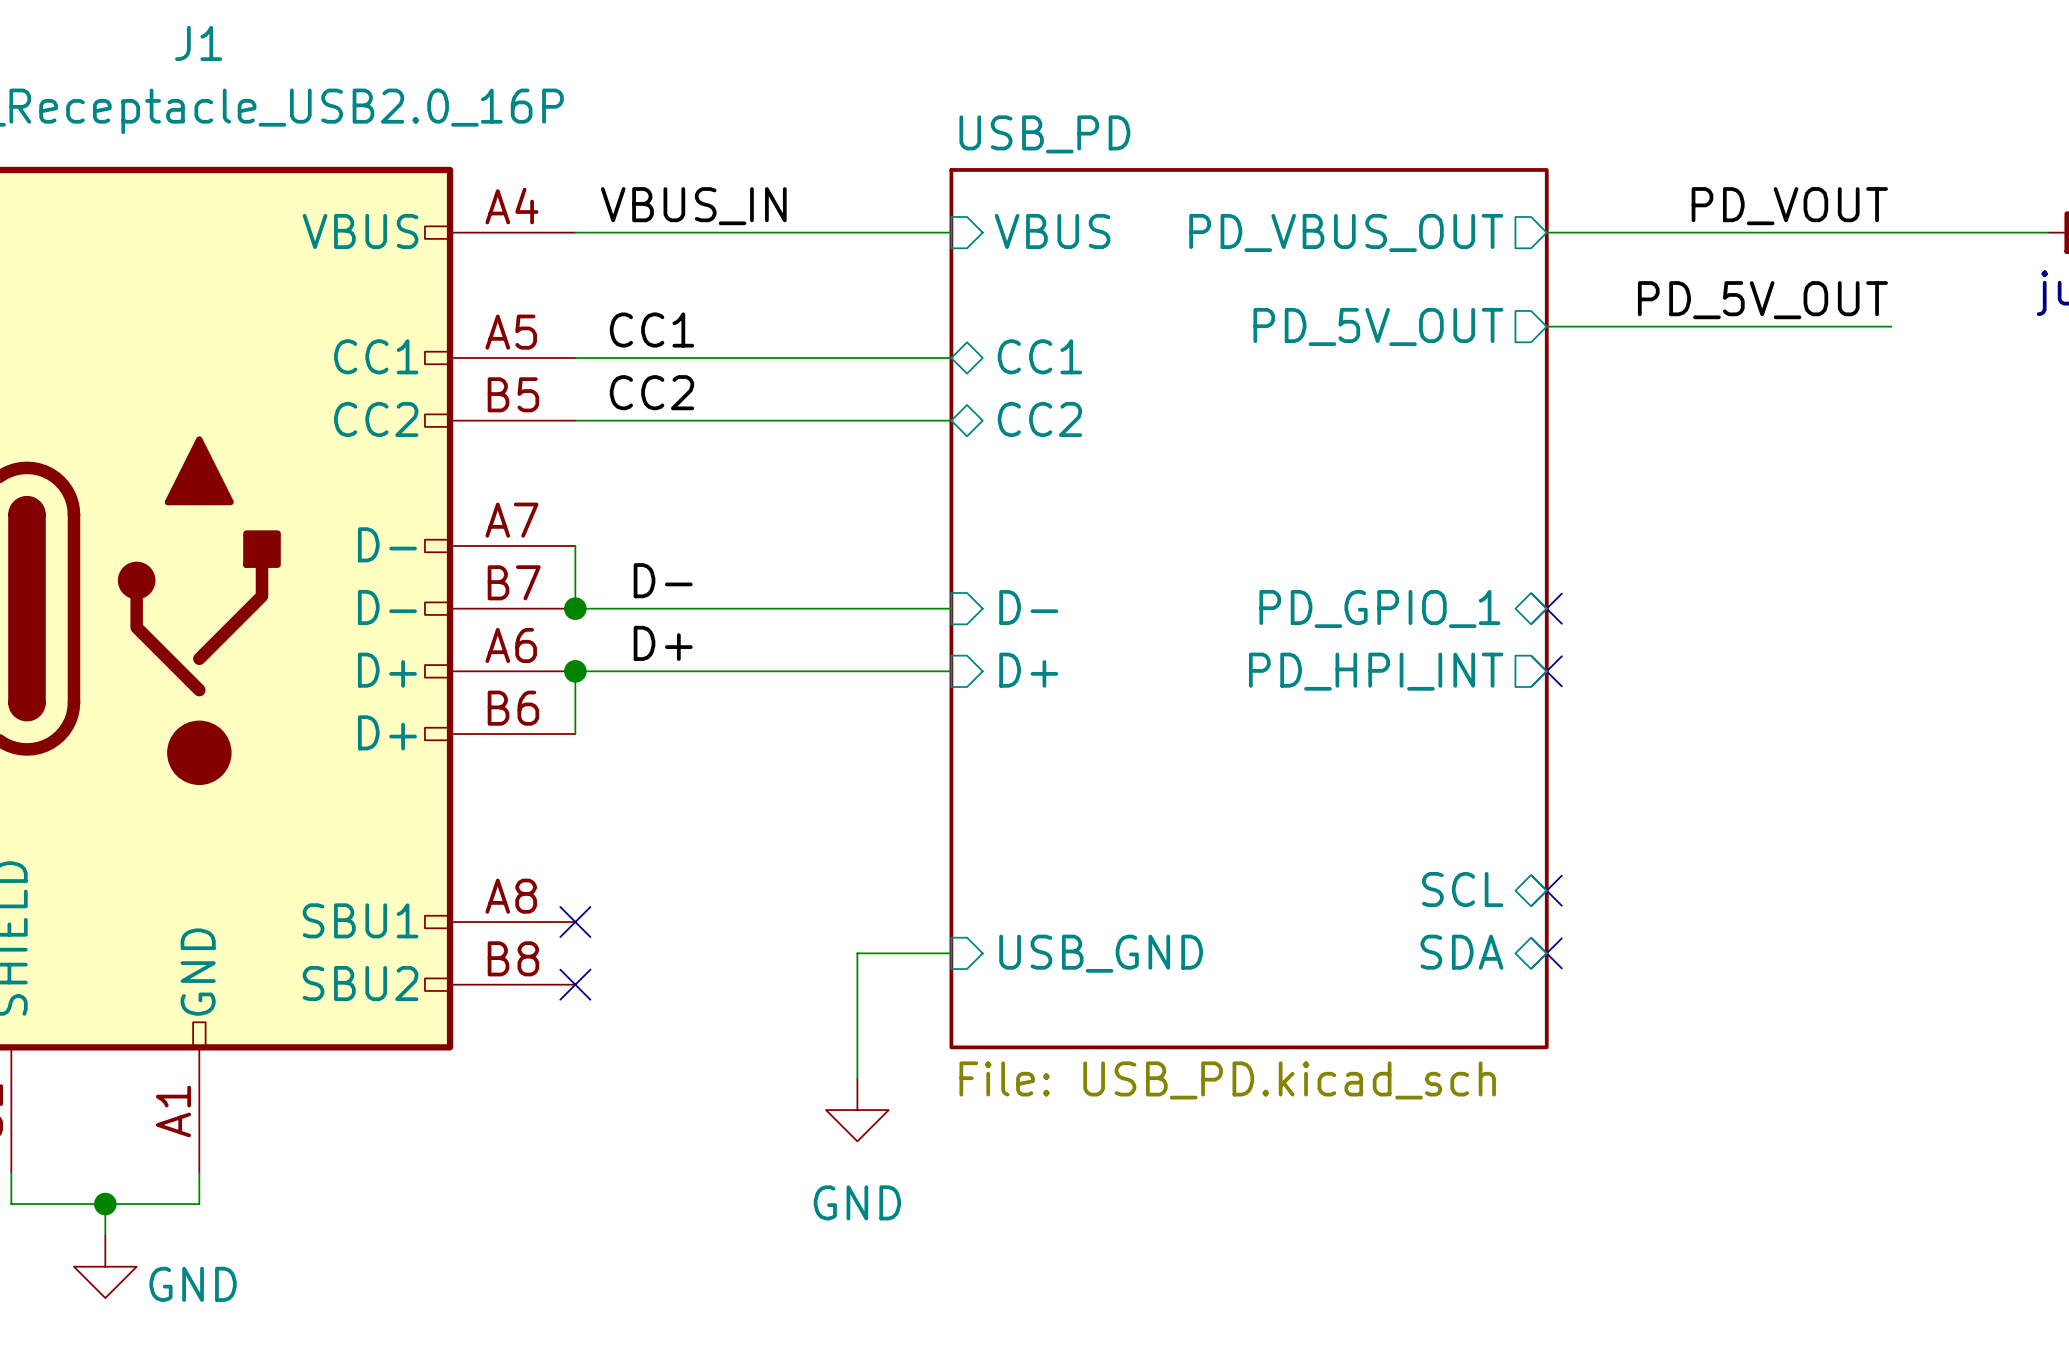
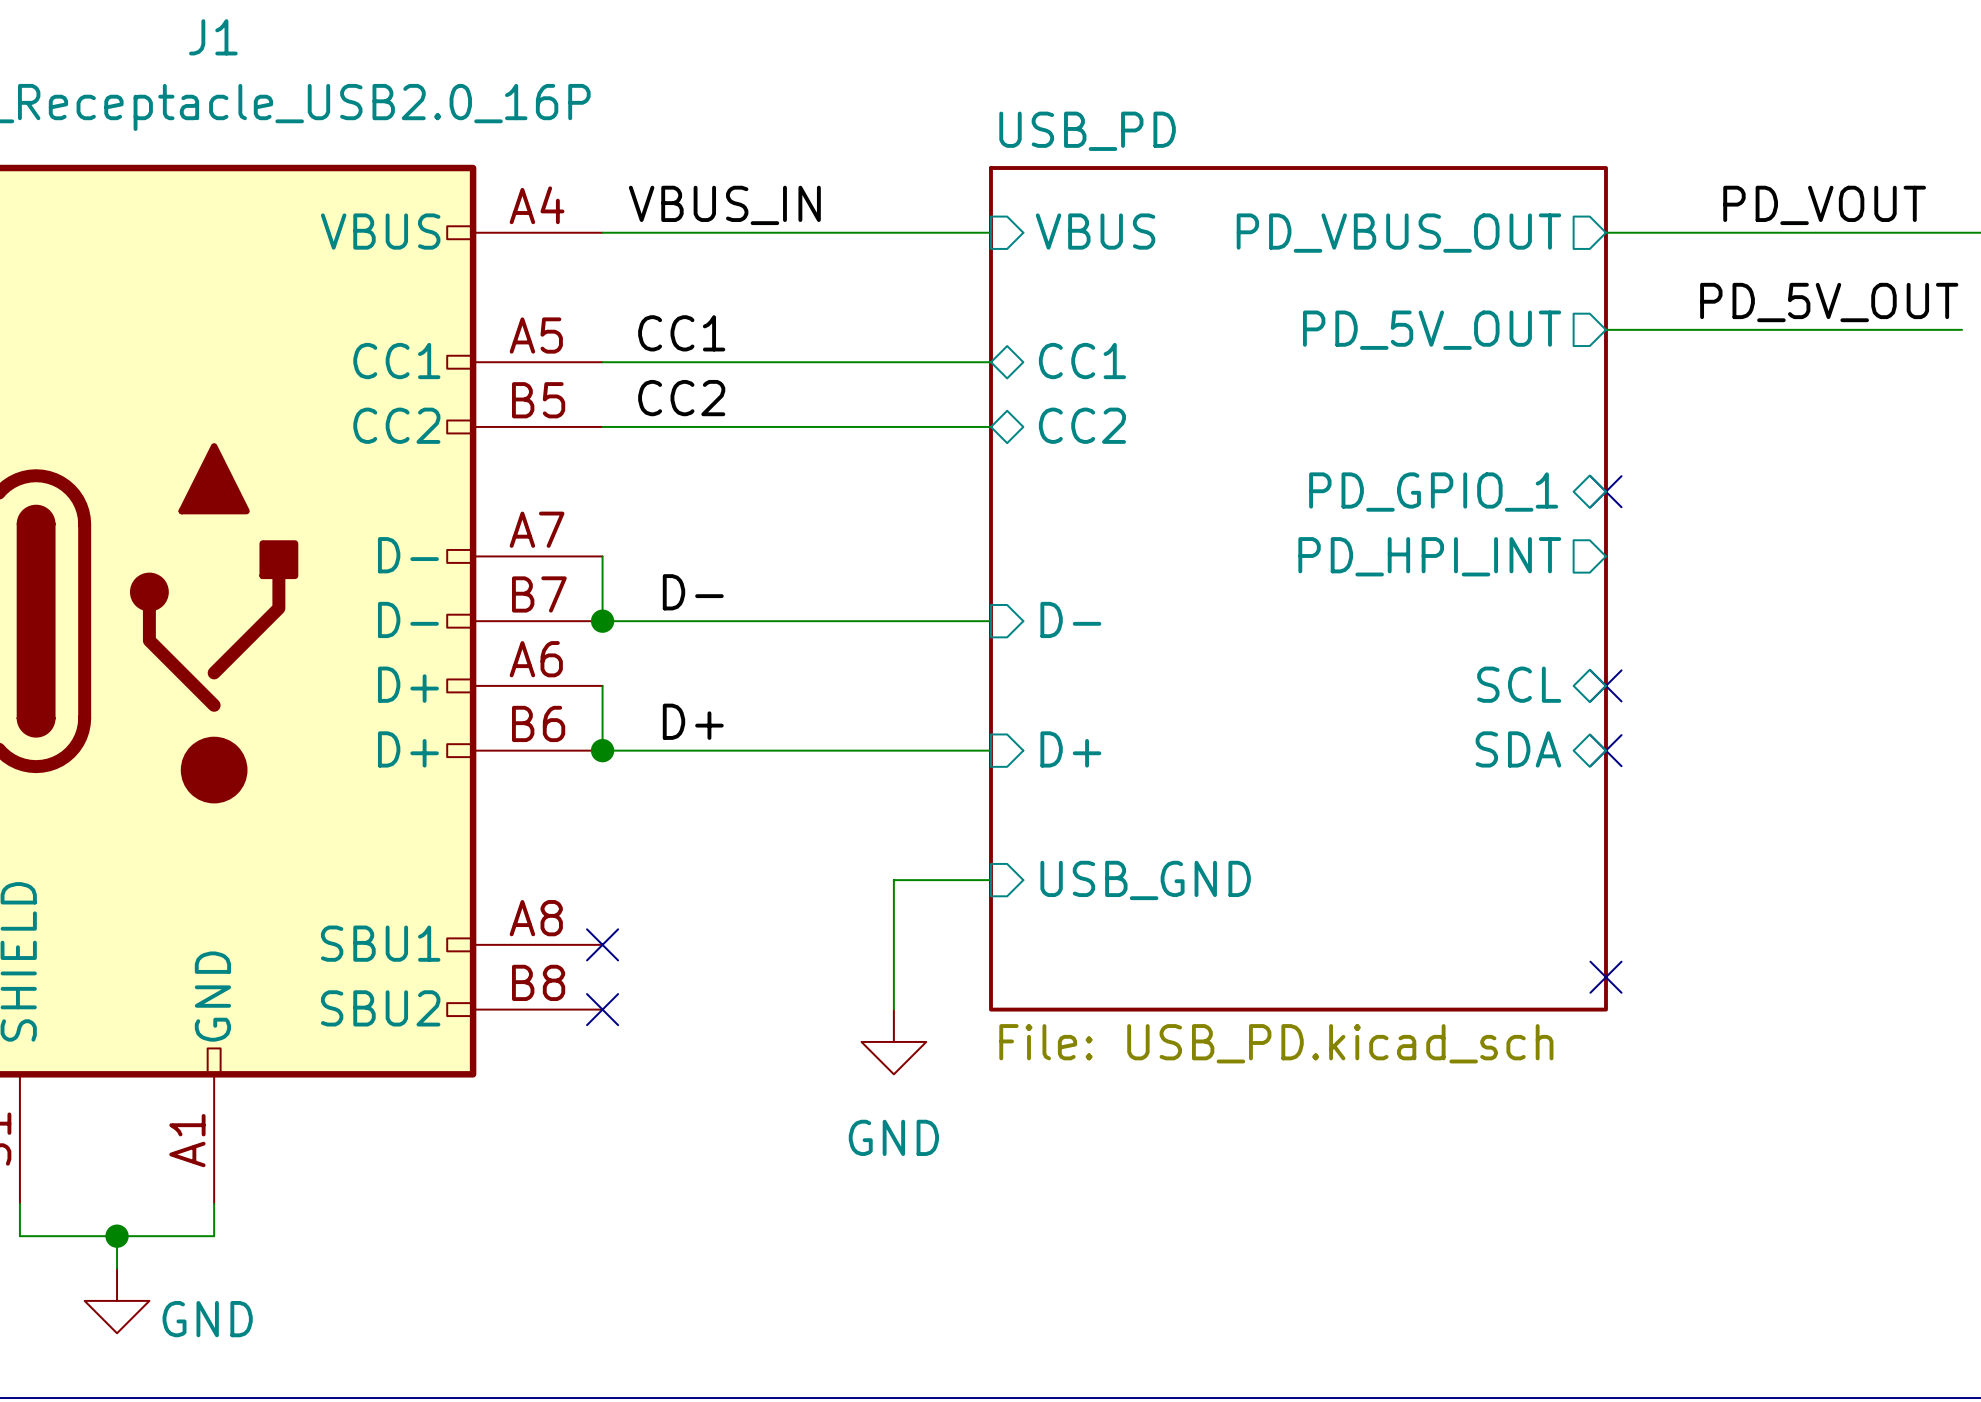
label position: PD_VOUT (1789, 206) -> PD_VOUT (1824, 205)
no-connect mark: none -> (1605, 491)
sheet pin: none -> PD_HPI_INT (1429, 556)
sheet USB_PD: none -> File: USB_PD.kicad_sch (1298, 588)
sheet USB_PD: File: USB_PD.kicad_sch (1249, 608) -> none
sheet pin position: PD_GPIO_1 (1379, 608) -> PD_GPIO_1 (1433, 492)
no-connect mark: (1546, 608) -> none
label position: D+ (663, 643) -> D+ (693, 721)
sheet pin position: D+ (1028, 670) -> D+ (1070, 749)
wire: (575, 671) (951, 671) -> (602, 750) (990, 750)
junction position: (575, 671) -> (602, 750)
sheet pin shape: output (1376, 671) -> bidirectional (1519, 684)
sheet pin: PD_HPI_INT (1376, 671) -> SCL (1519, 684)
no-connect mark: none -> (1605, 750)
sheet pin: SCL (1462, 889) -> none
no-connect mark: (1546, 890) -> none
sheet pin position: SDA (1461, 952) -> SDA (1518, 749)
wire: (857, 953) (951, 953) -> (893, 977) (893, 880) (990, 880)
sheet pin position: USB_GND (1101, 953) -> USB_GND (1145, 880)
wire: (857, 984) (857, 1078) -> none
power symbol position: GND (857, 1110) -> GND (893, 1041)

